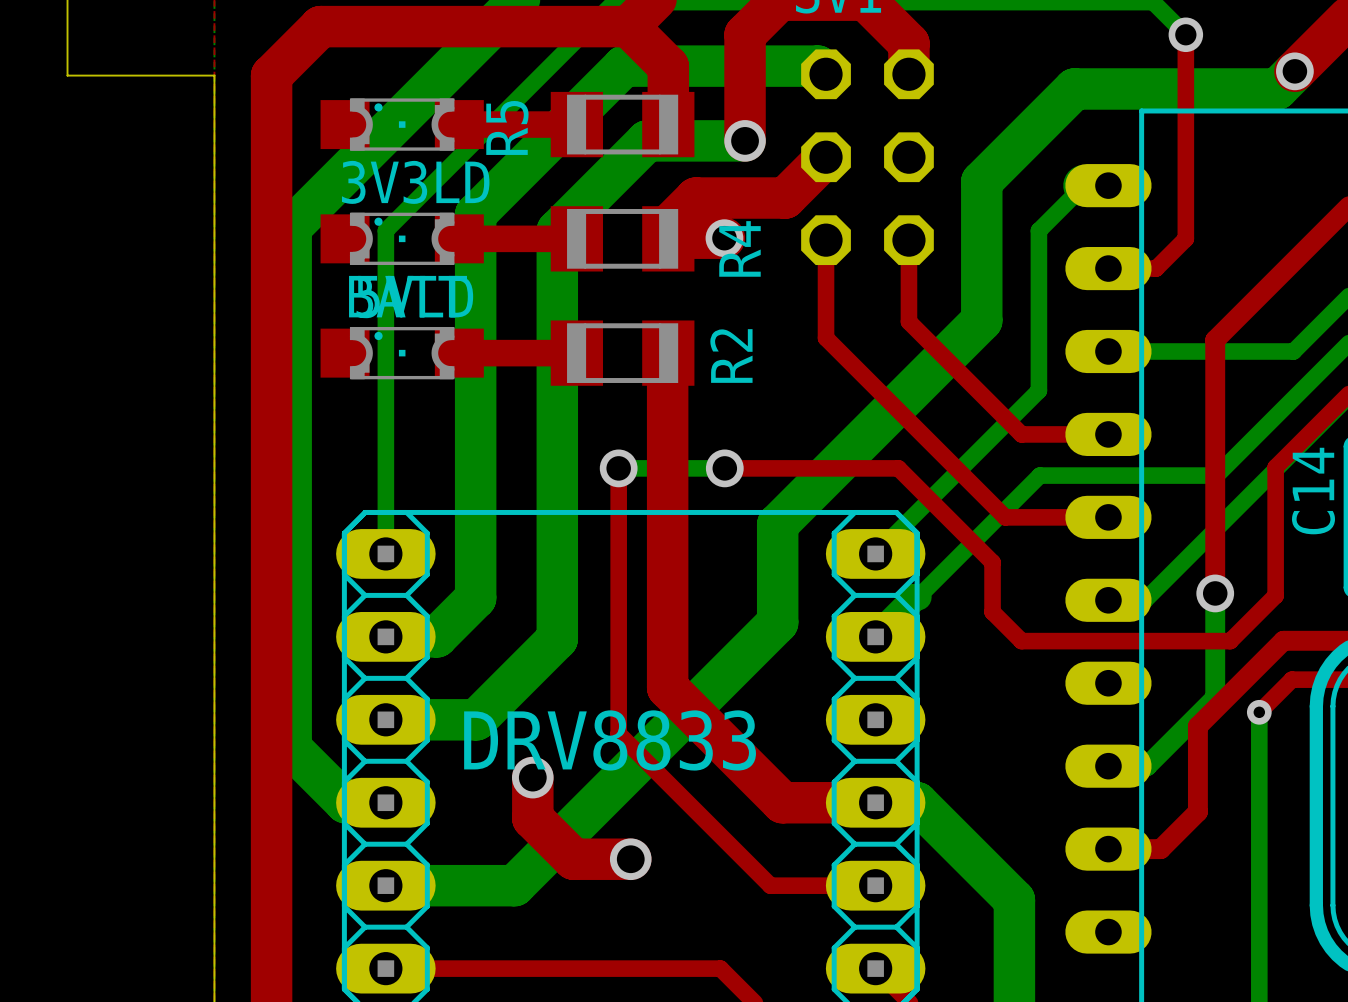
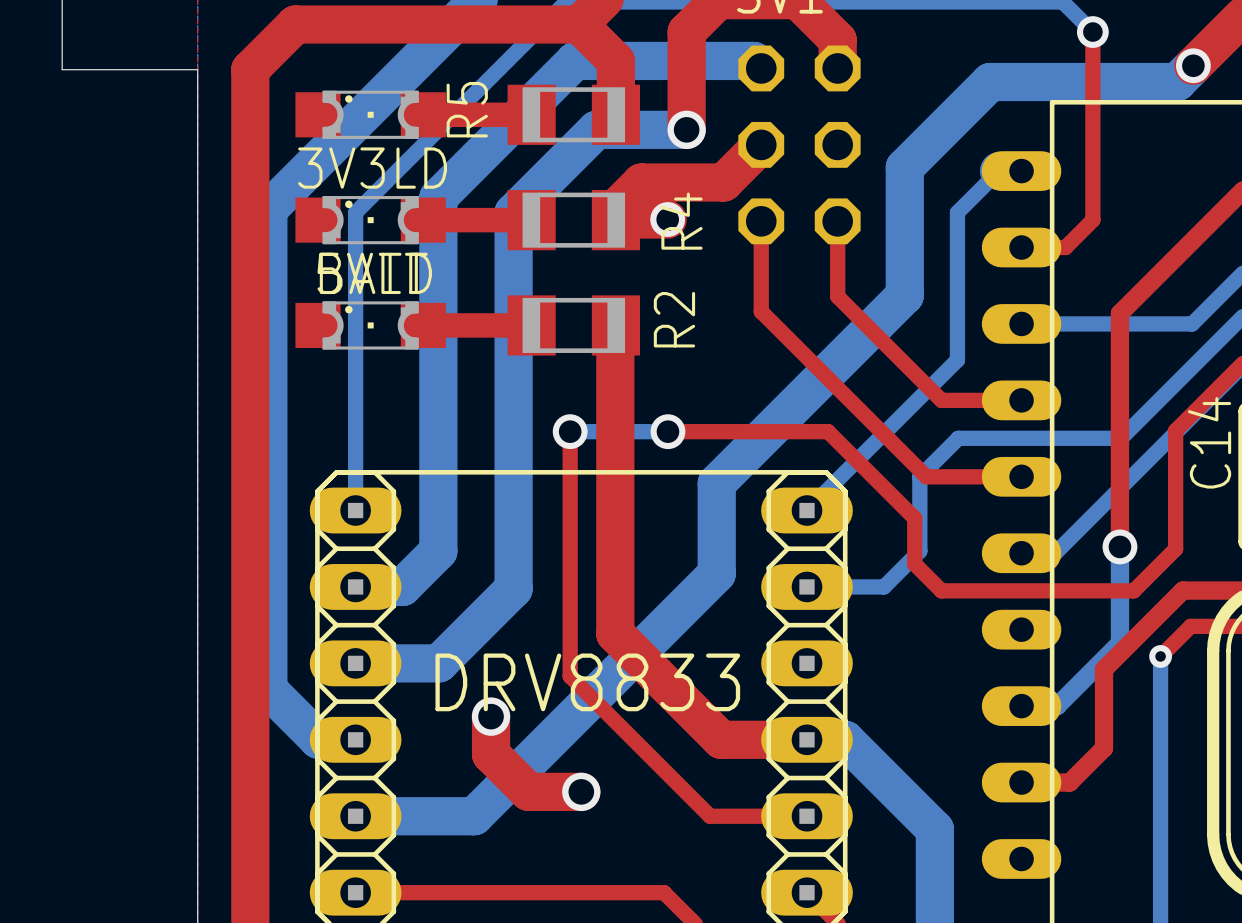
bottom track: (998, 517) (875, 636) -> (919, 476) (919, 551) (884, 586) (807, 586)

